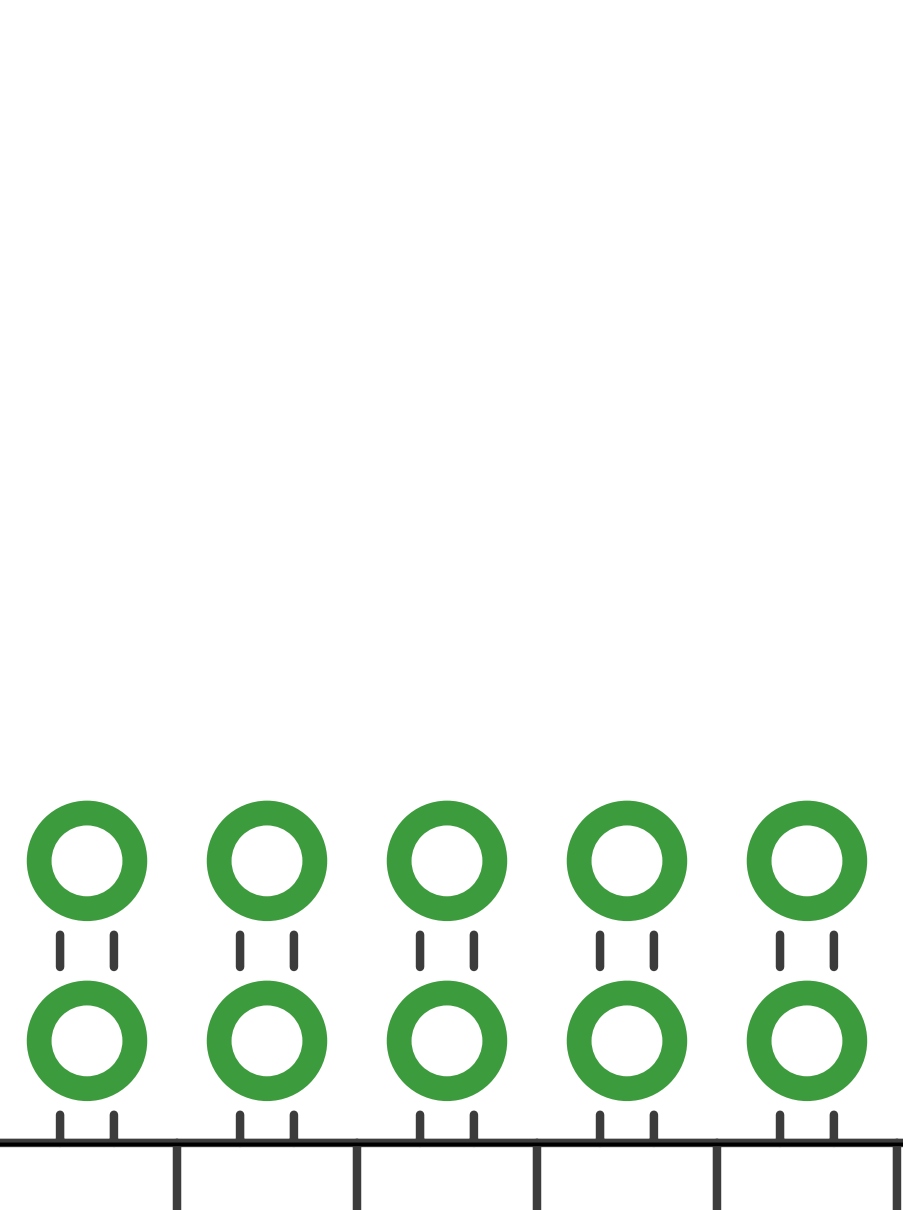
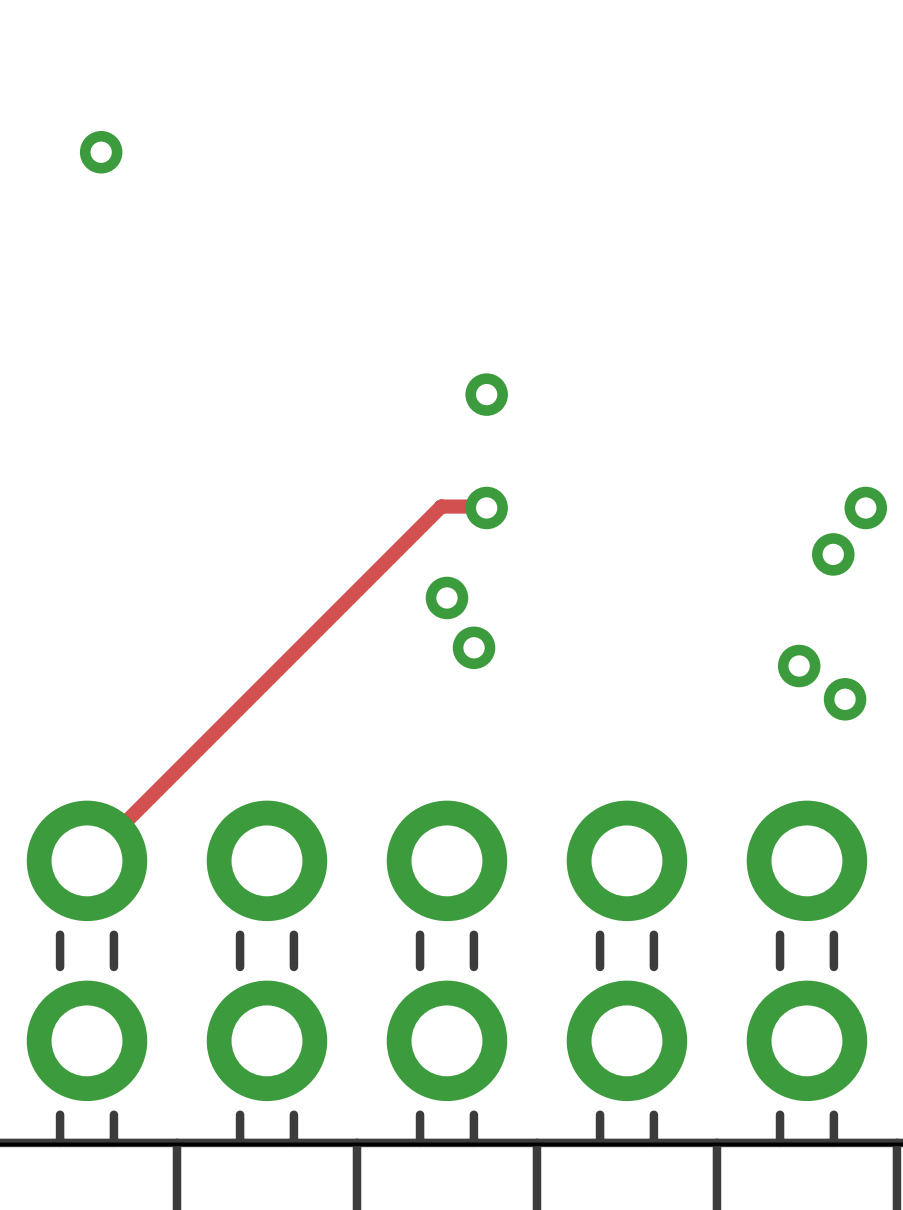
via: none -> (101, 152)
via: none -> (486, 394)
track: none -> (486, 507) (441, 506) (86, 860)
via: none -> (486, 507)
via: none -> (865, 507)
via: none -> (833, 554)
via: none -> (446, 597)
via: none -> (474, 647)
via: none -> (799, 666)
via: none -> (845, 699)

